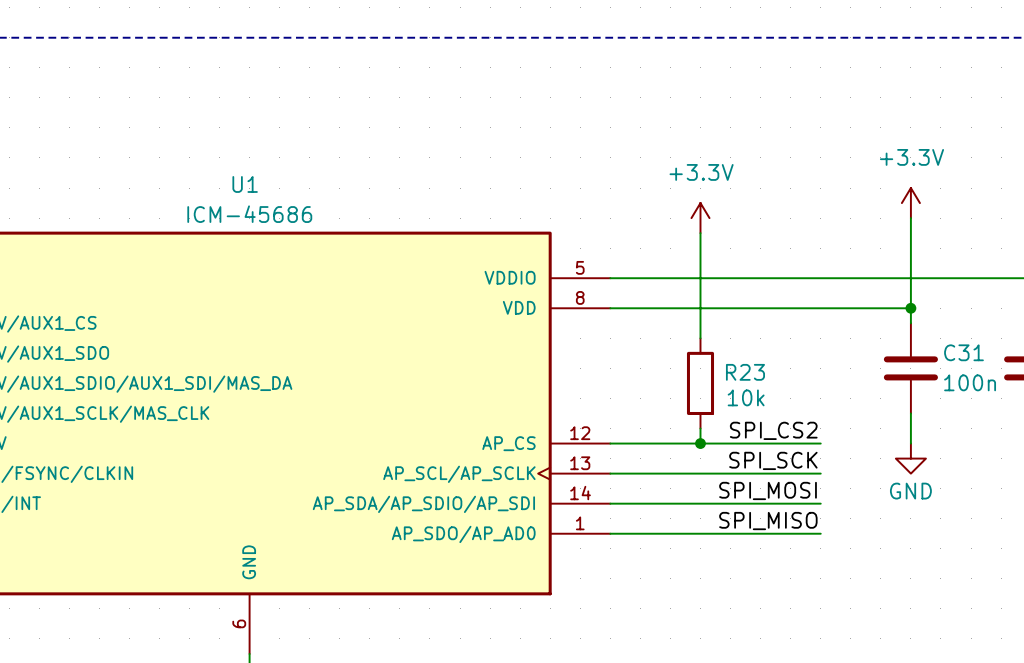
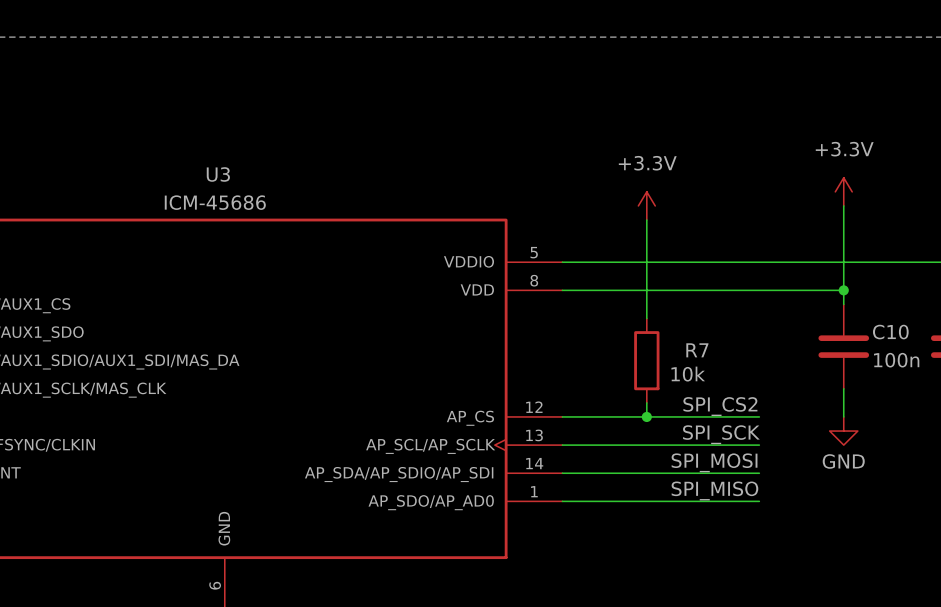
U1 name: U1 (245, 184) -> U3 (218, 174)
C31 name: C31 (963, 352) -> C10 (890, 332)
R23 name: R23 (745, 372) -> R7 (697, 350)

